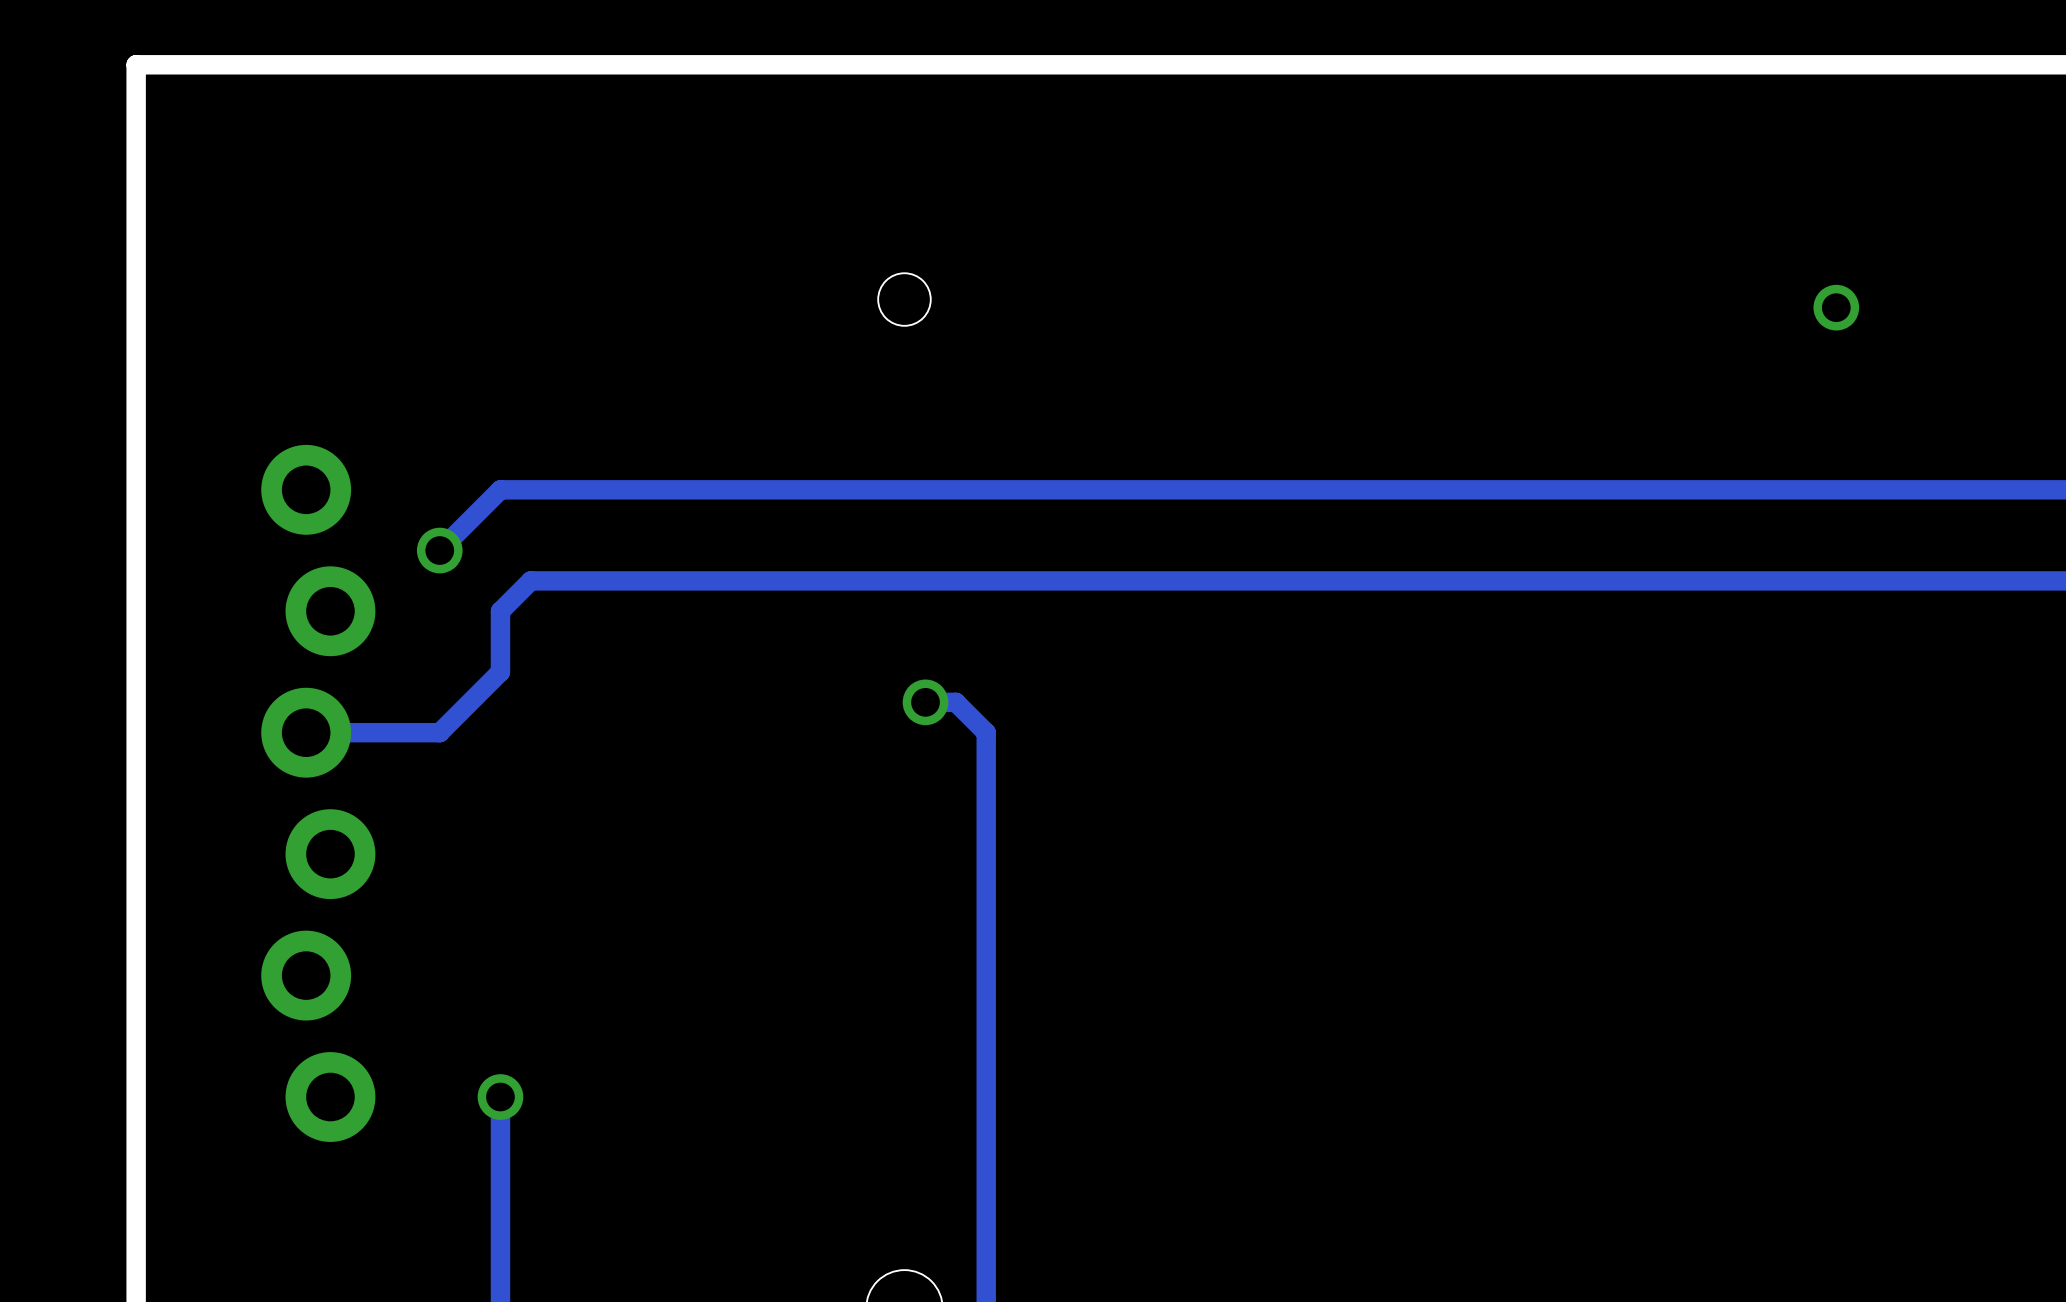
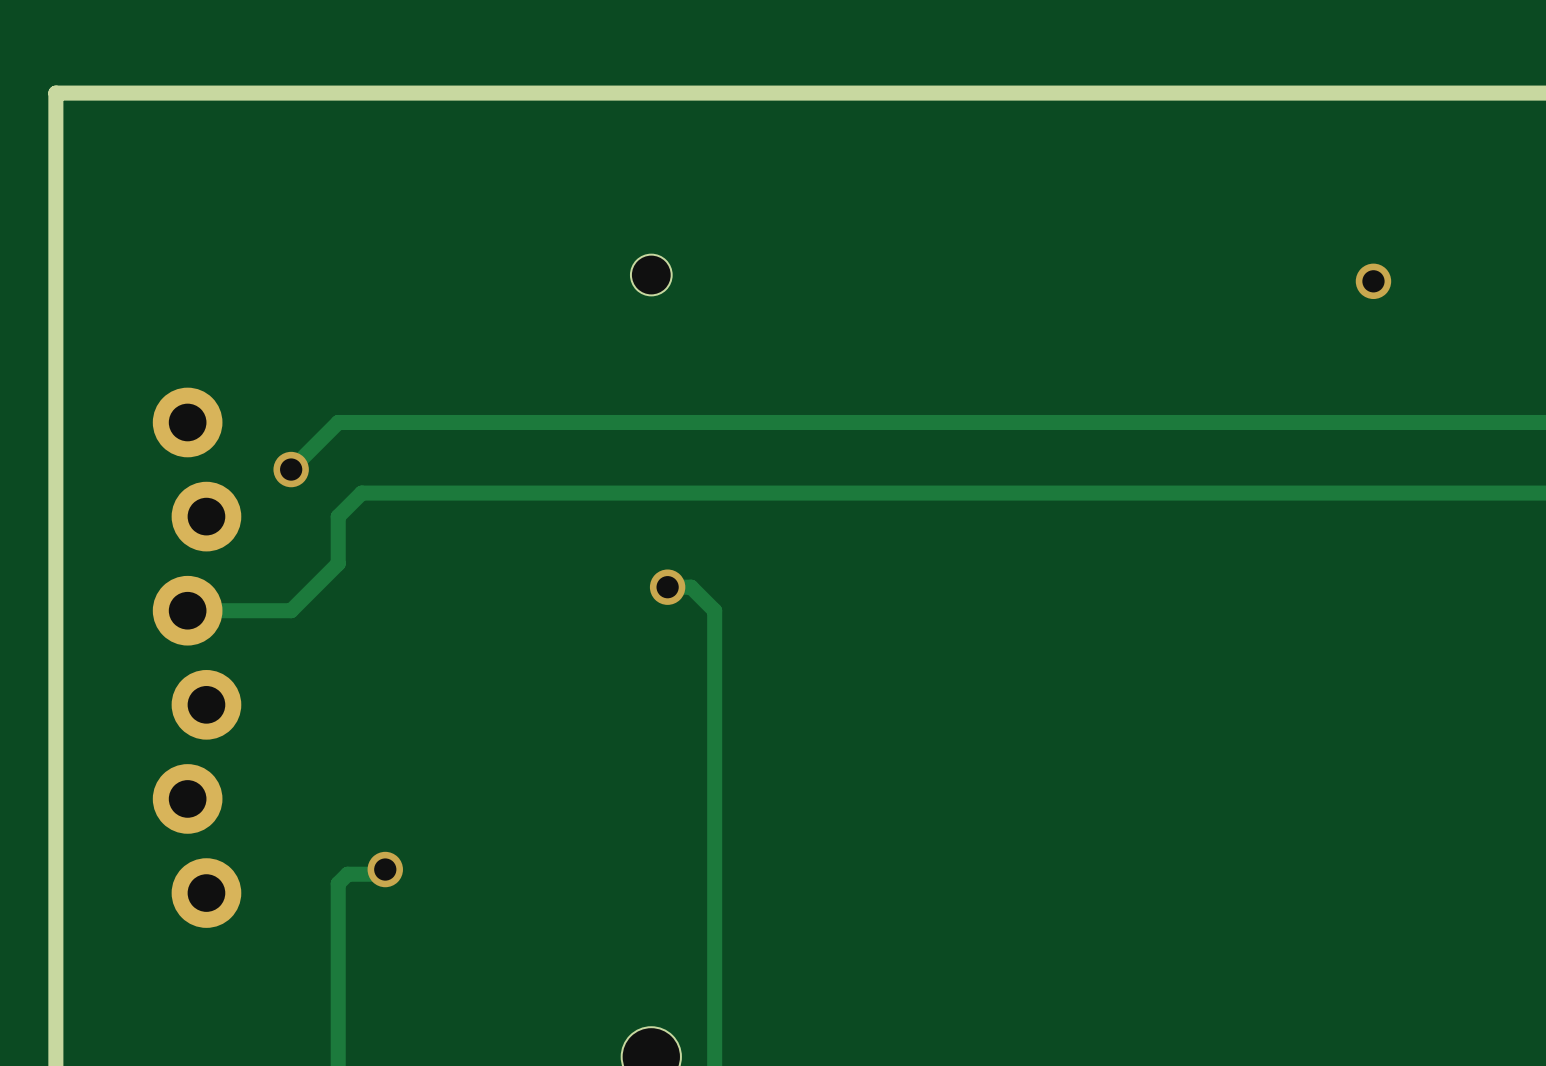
track: none -> (385, 869) (380, 874) (347, 874) (338, 883) (338, 893)
via position: (500, 1097) -> (385, 869)

